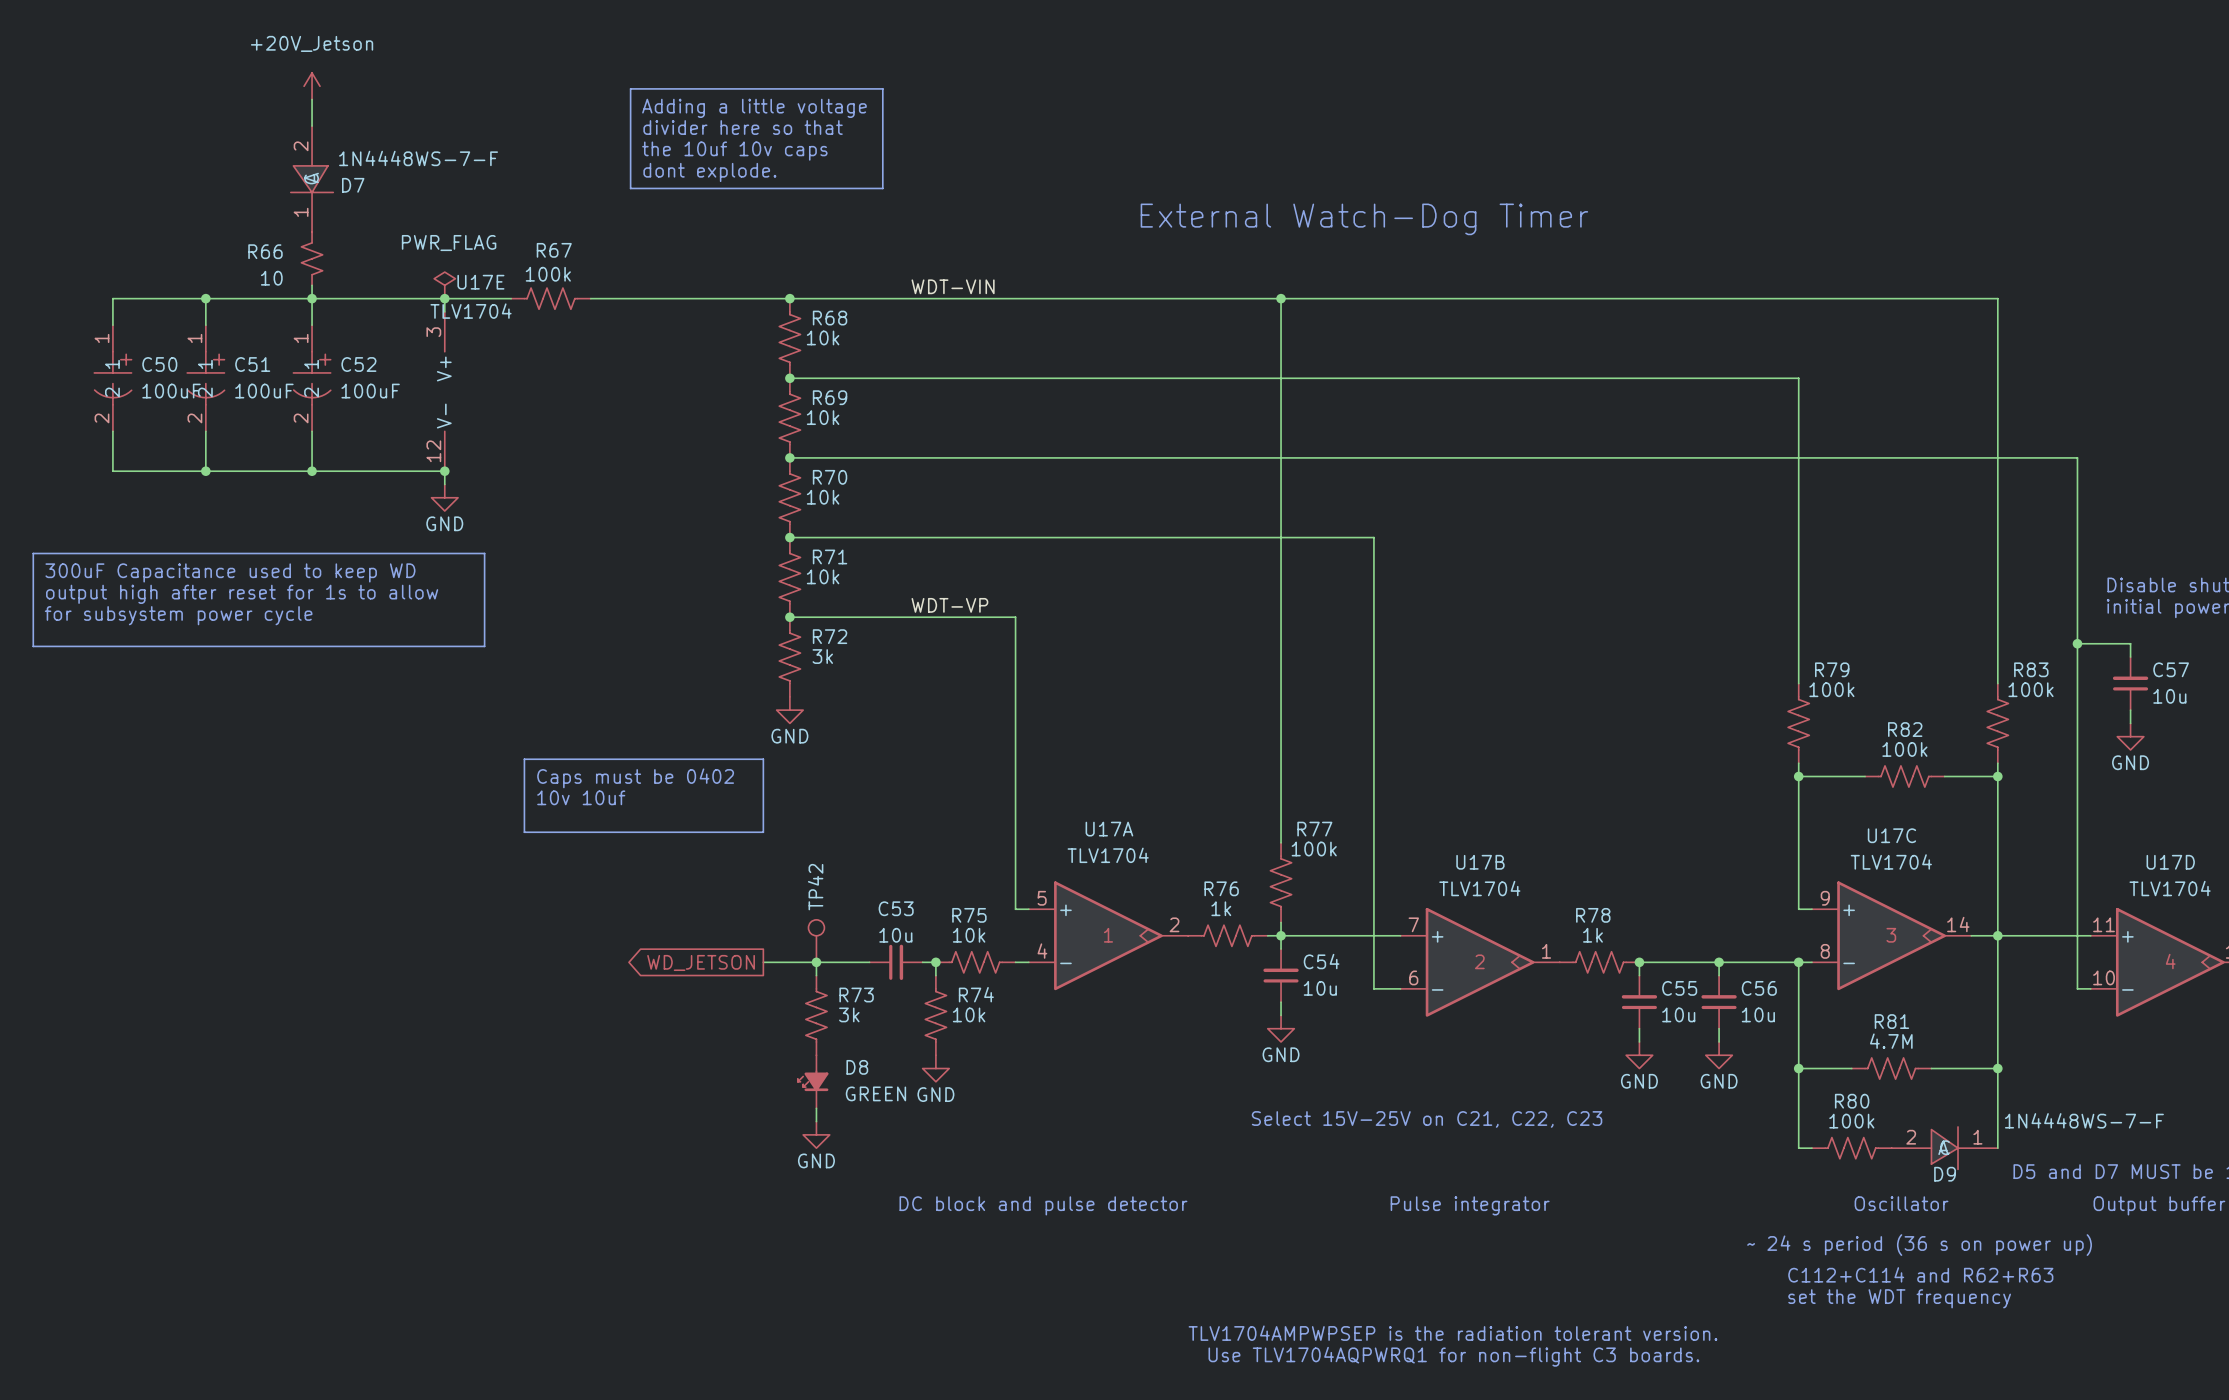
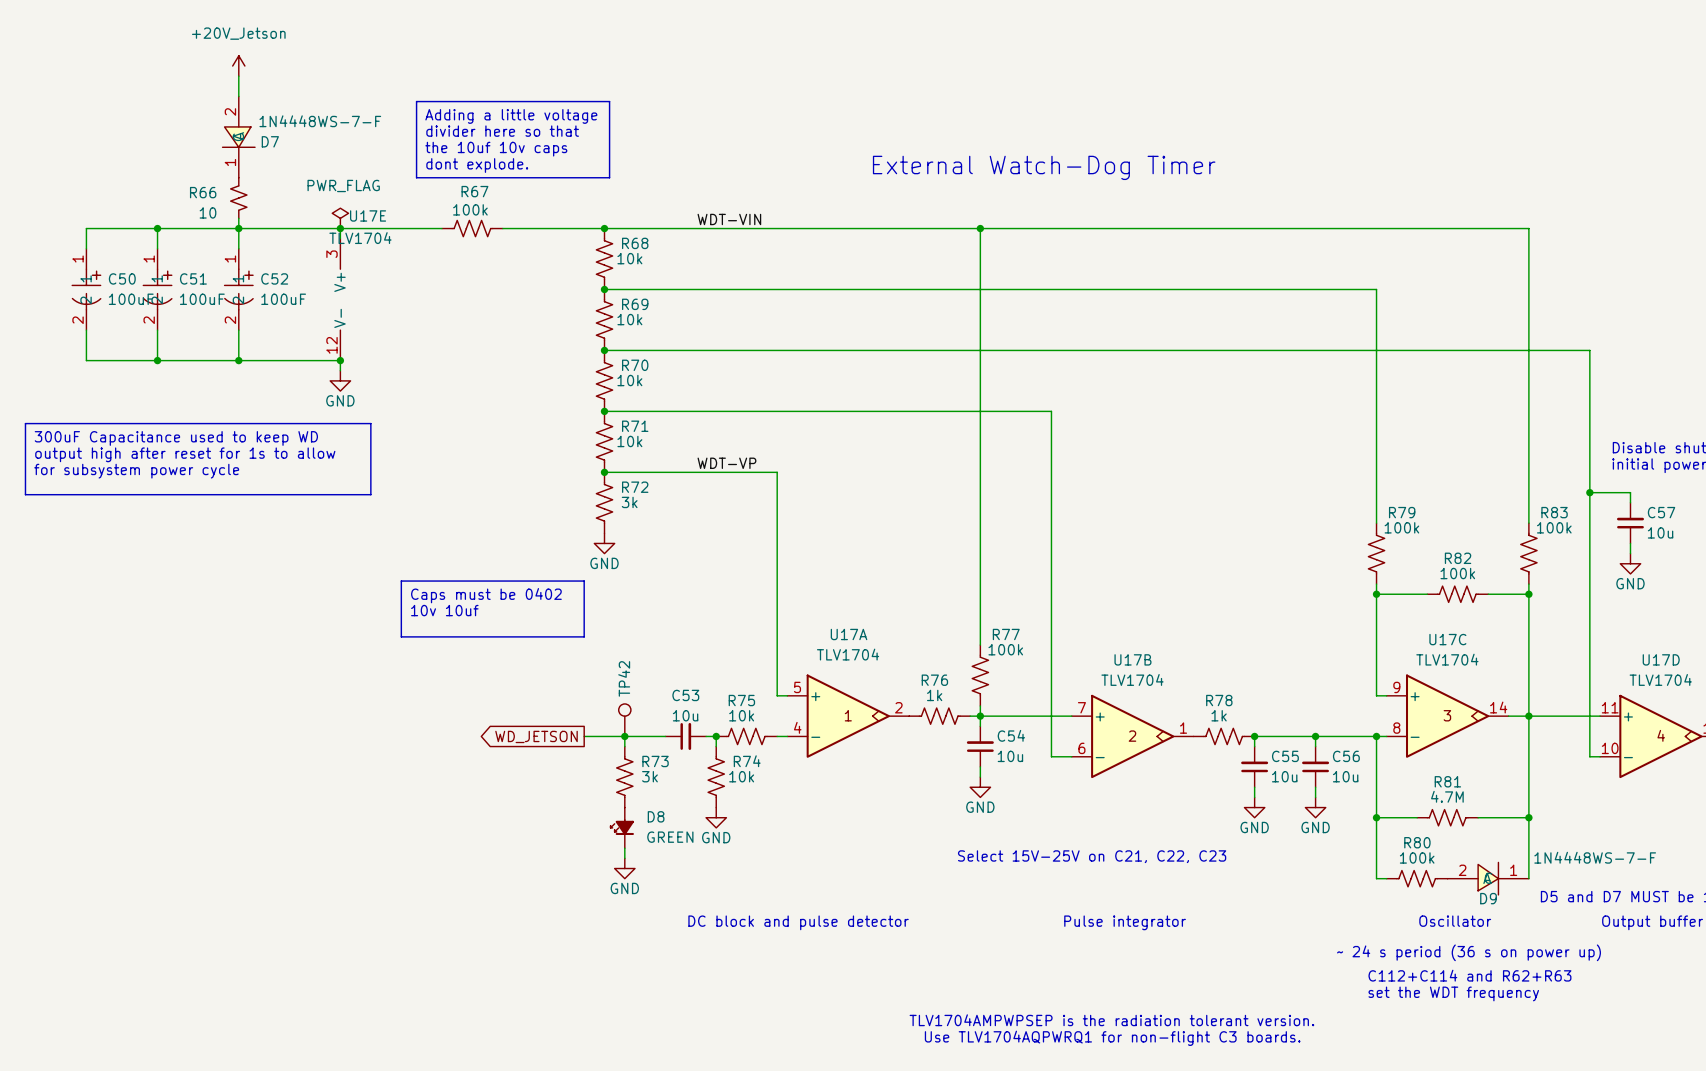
line: (630, 88) (882, 88) (882, 188) (630, 188) (630, 88) -> (416, 101) (609, 101) (609, 177) (416, 177) (416, 101)
text position: Adding a little voltage (754, 108) -> Adding a little voltage (511, 116)
text position: divider here so that (743, 127) -> divider here so that (502, 131)
text position: the 10uf 10v caps (734, 151) -> the 10uf 10v caps (496, 149)
text position: dont explode. (709, 172) -> dont explode. (477, 165)
R67 position: (550, 298) -> (472, 228)
wire: (590, 298) (657, 298) -> (391, 228) (441, 228)

